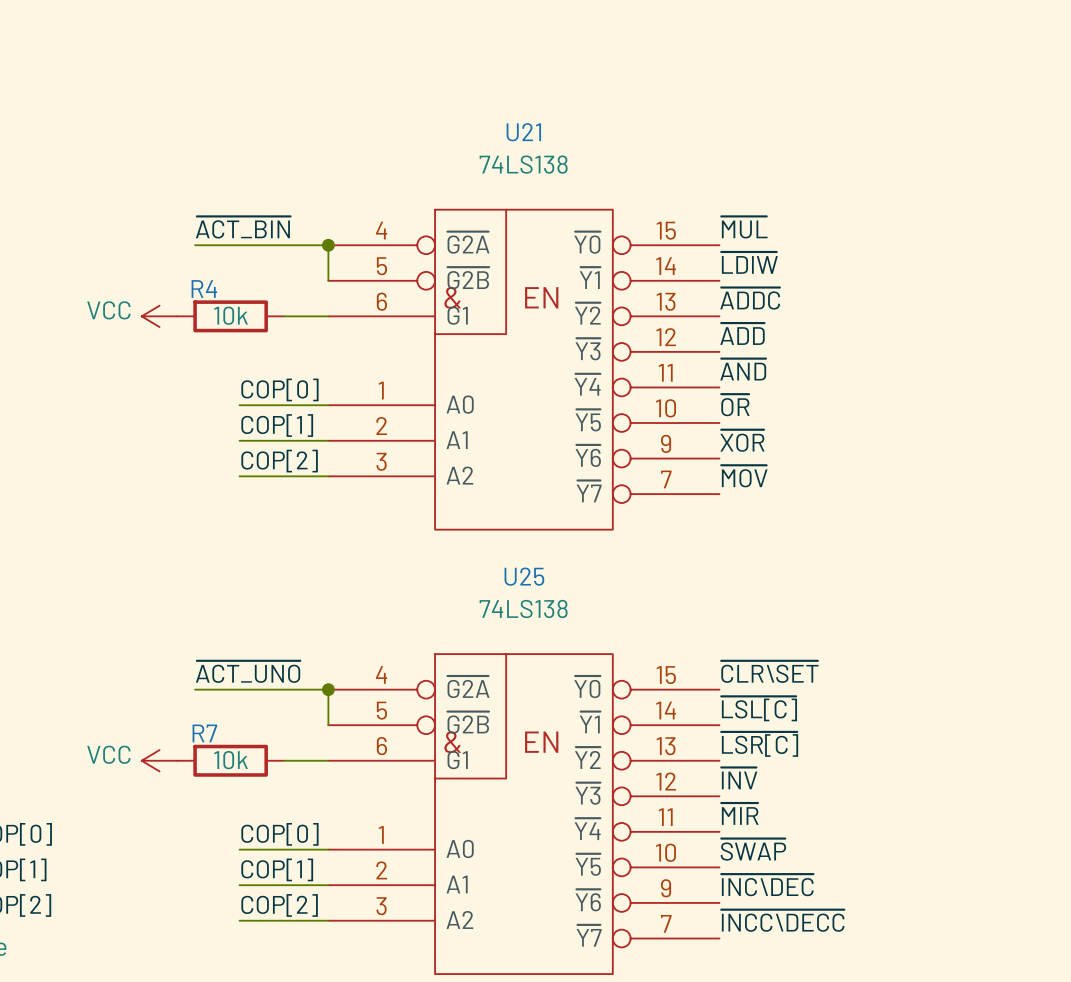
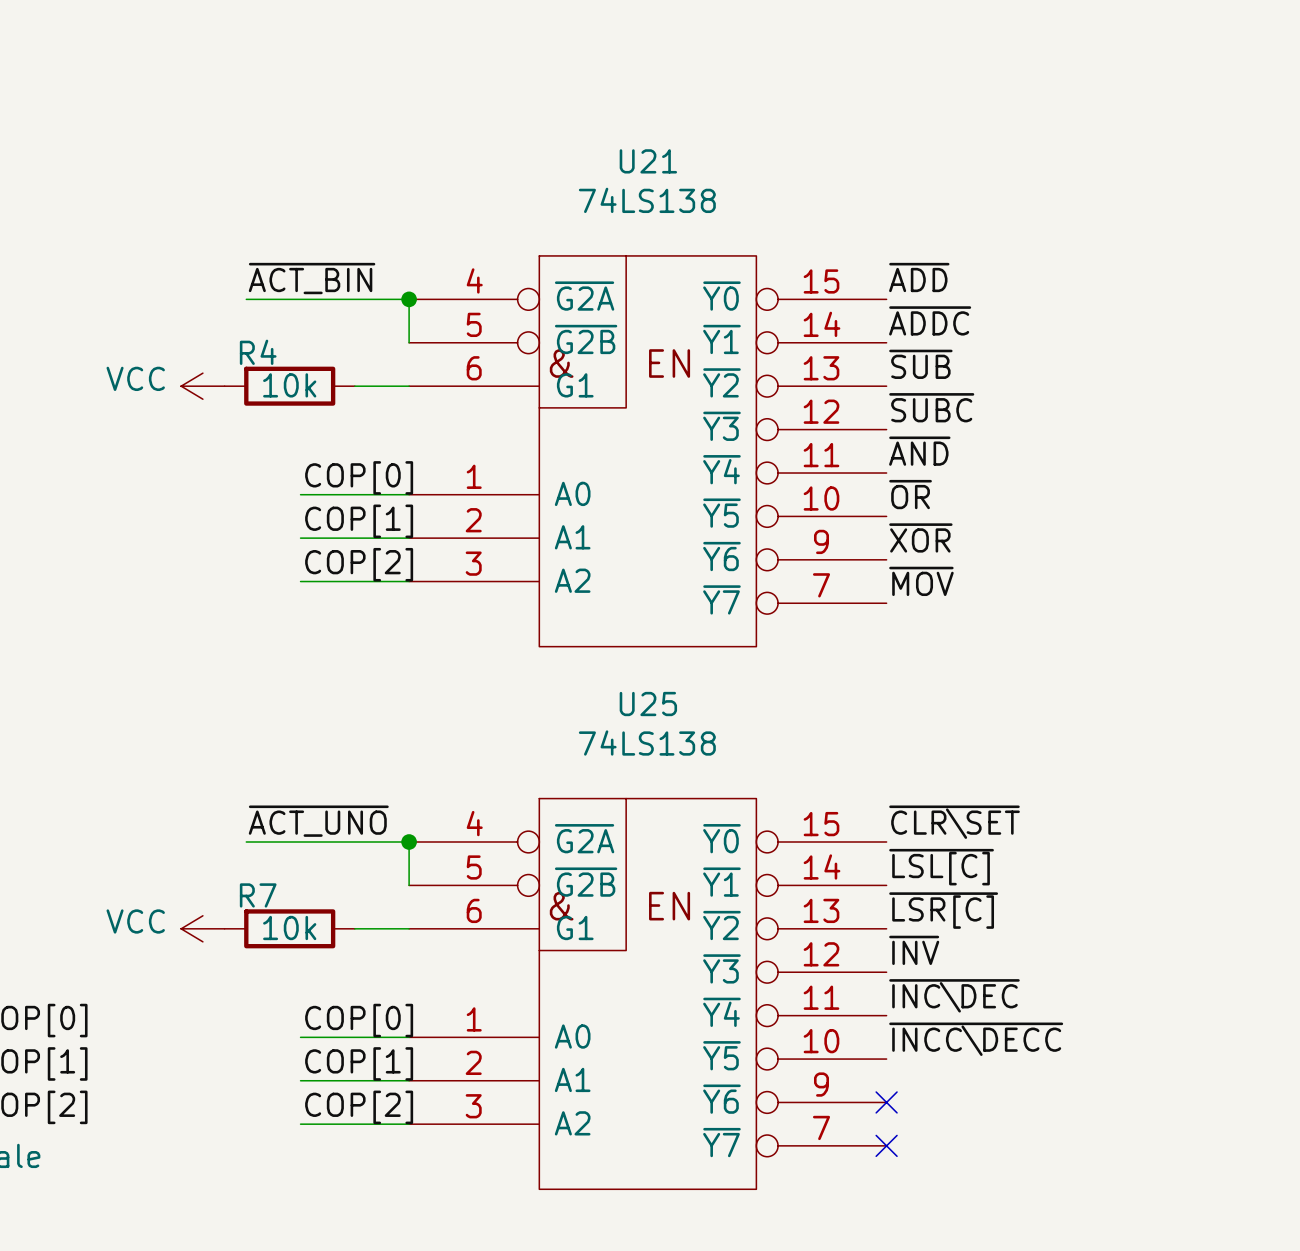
label: ~{MUL} (744, 227) -> ~{ADD} (919, 277)
label: ~{LDIW} (749, 262) -> ~{ADDC} (930, 320)
label: ~{ADDC} (750, 298) -> ~{SUB} (920, 364)
label: ~{ADD} (742, 334) -> ~{SUBC} (931, 407)
label: ~{MIR} (739, 813) -> ~{INC\DEC} (954, 995)
label: ~{SWAP} (753, 849) -> ~{INCC\DECC} (976, 1039)
label: ~{INC\DEC} (767, 885) -> none
no-connect mark: none -> (886, 1102)
label: ~{INCC\DECC} (782, 920) -> none
no-connect mark: none -> (886, 1145)

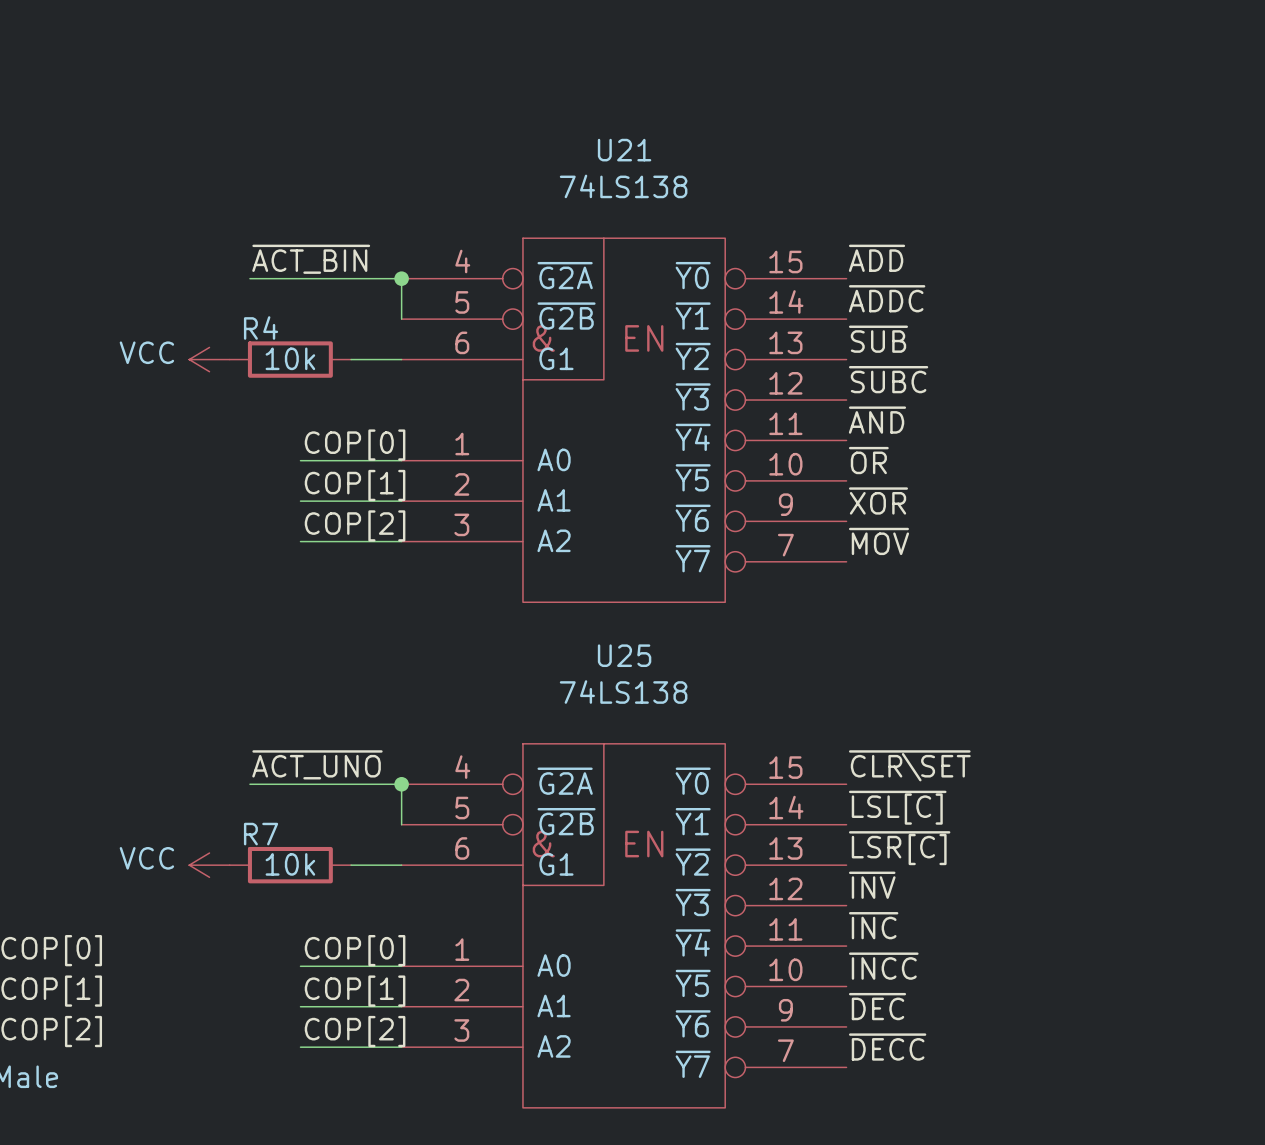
label: ~{INC\DEC} (954, 995) -> ~{INC} (873, 925)
label: ~{INCC\DECC} (976, 1039) -> ~{INCC} (883, 966)
label: none -> ~{DEC} (877, 1006)
no-connect mark: (886, 1102) -> none
label: none -> ~{DECC} (887, 1047)
no-connect mark: (886, 1145) -> none

